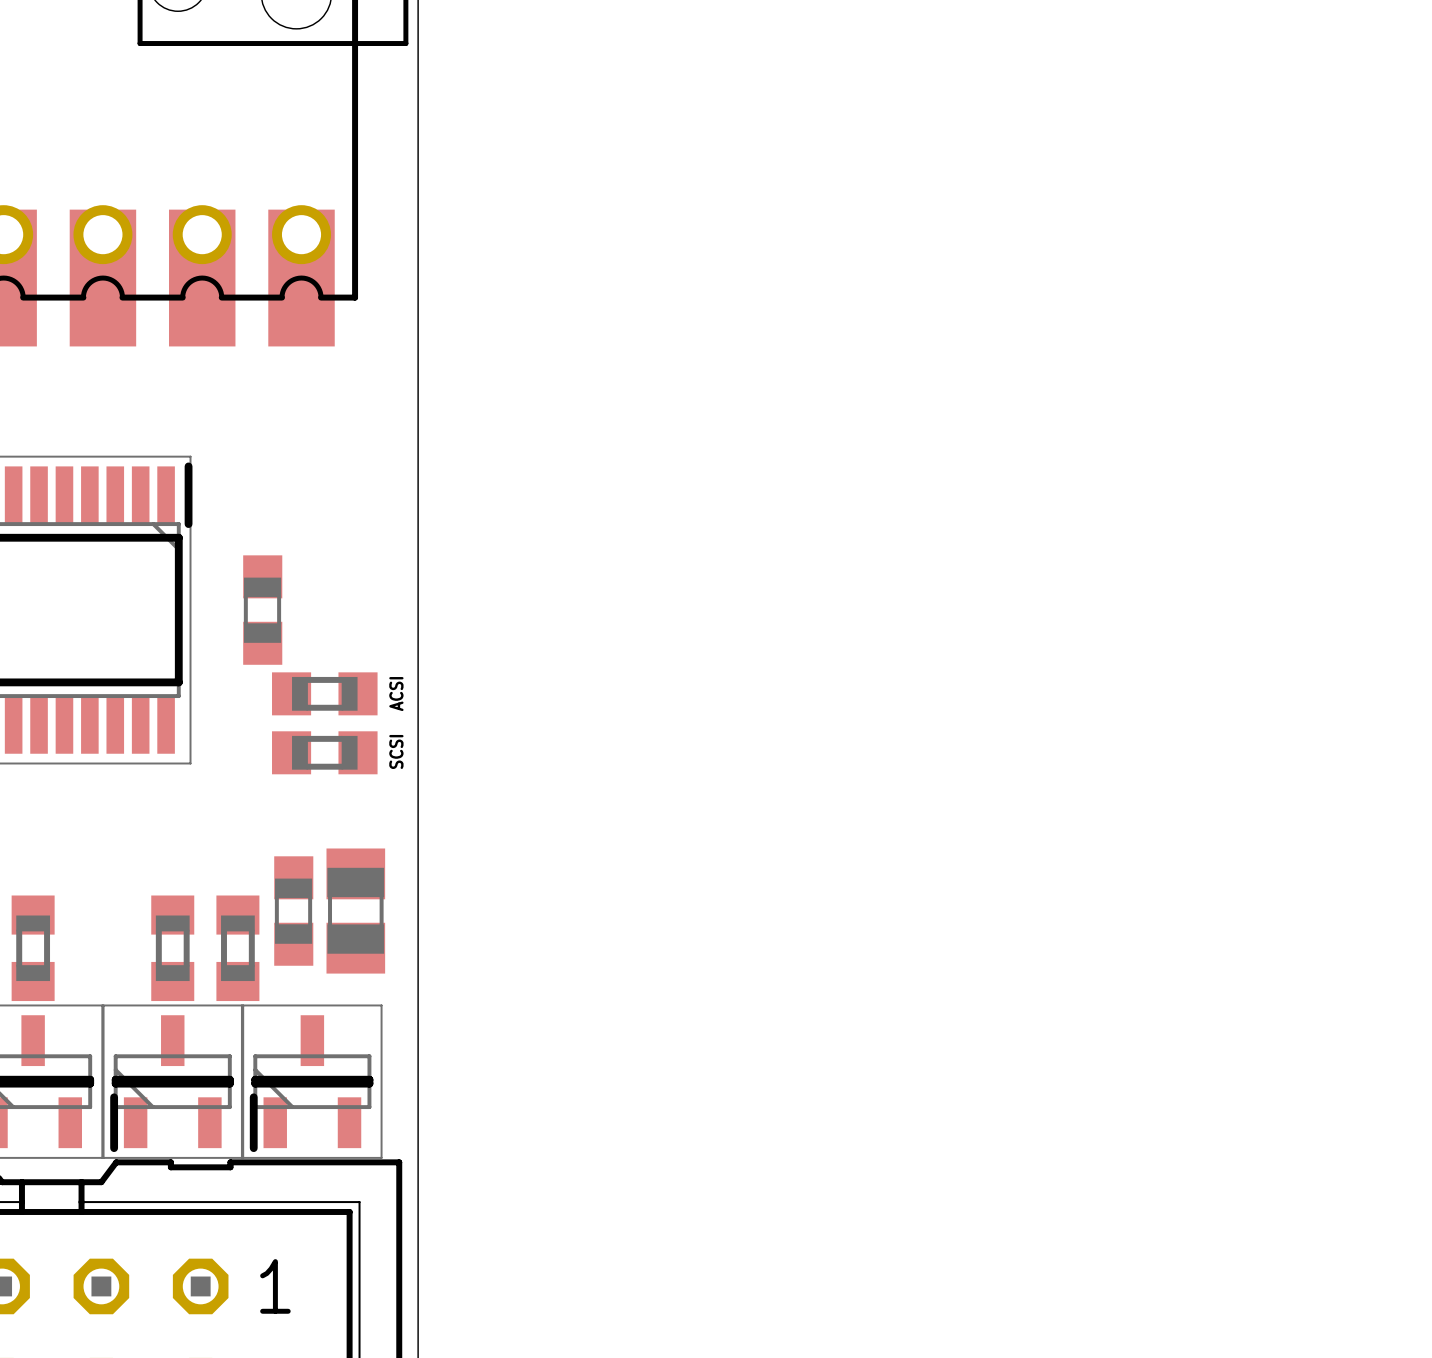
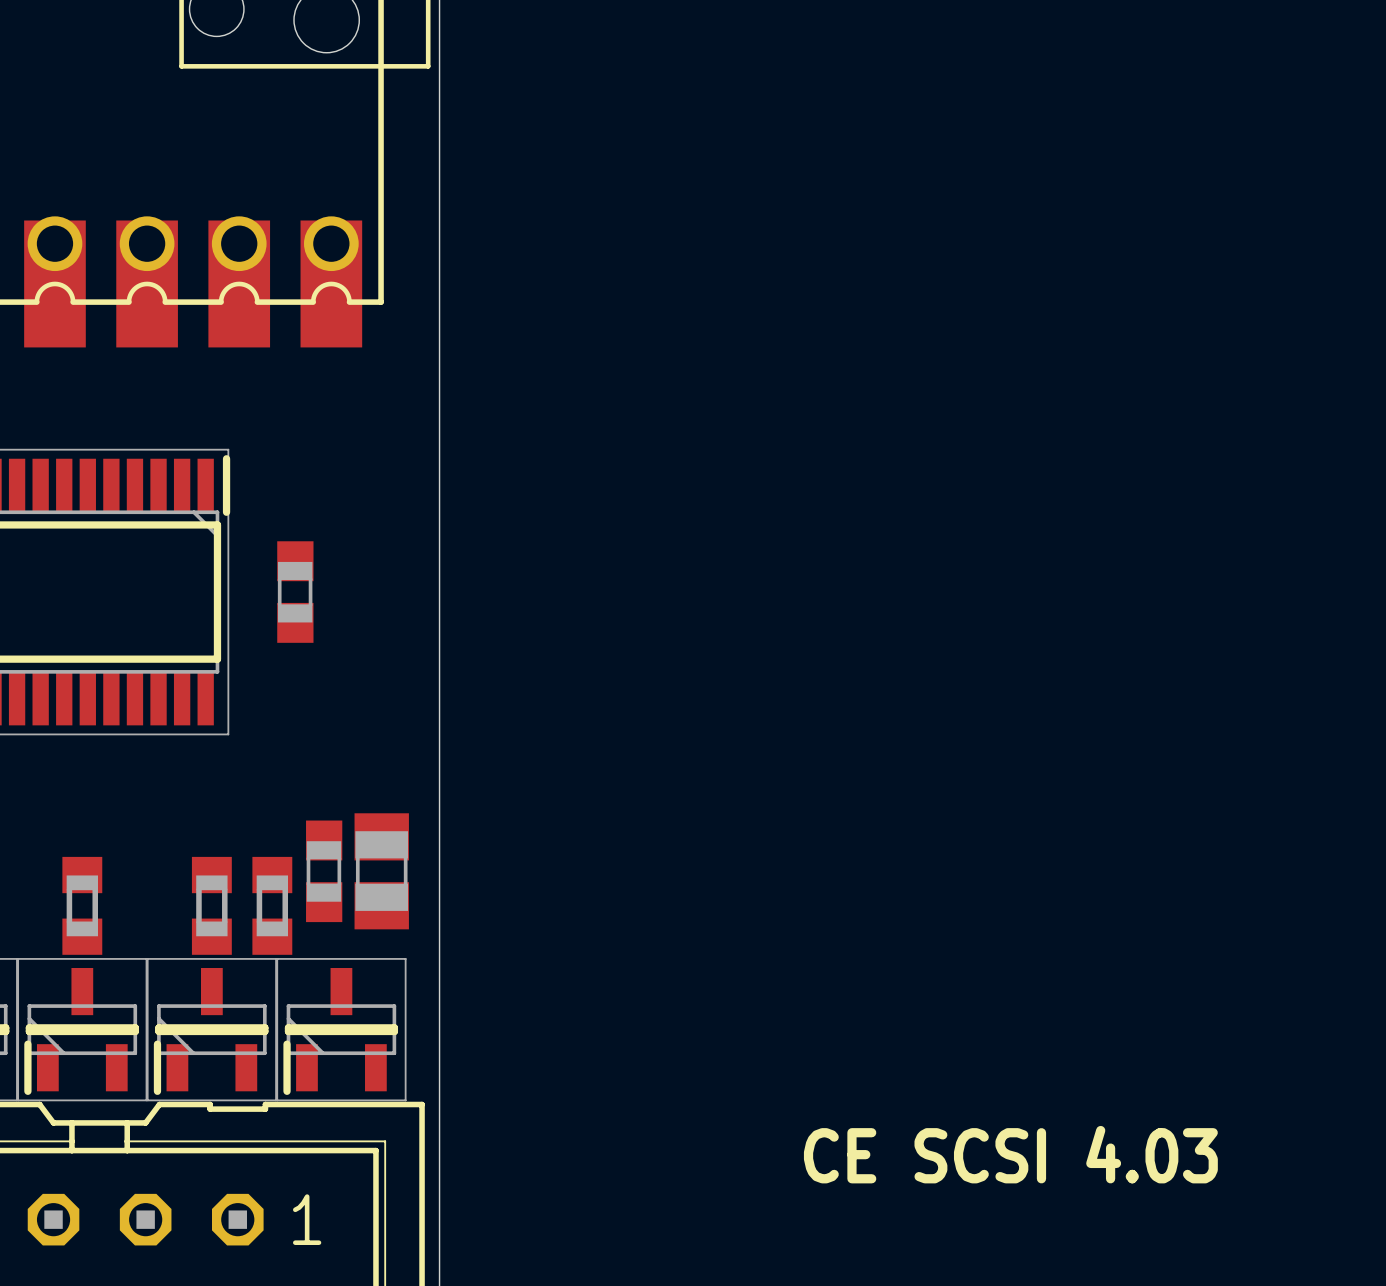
part: (324, 693) -> none
text: ACSI (396, 694) -> none
text: SCSI (396, 751) -> none
part: (324, 752) -> none
text: none -> CE SCSI 4.03 (1010, 1154)

